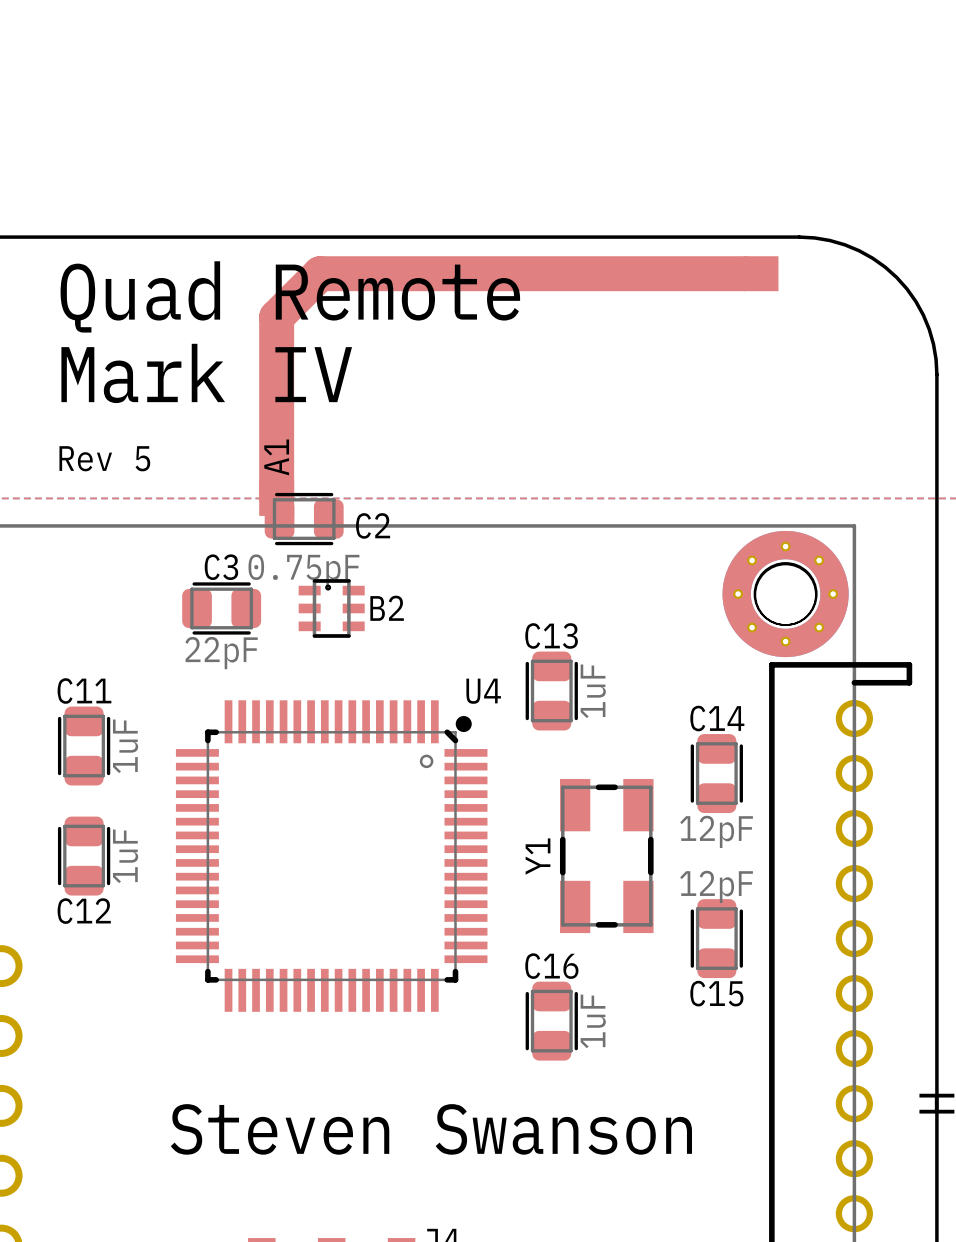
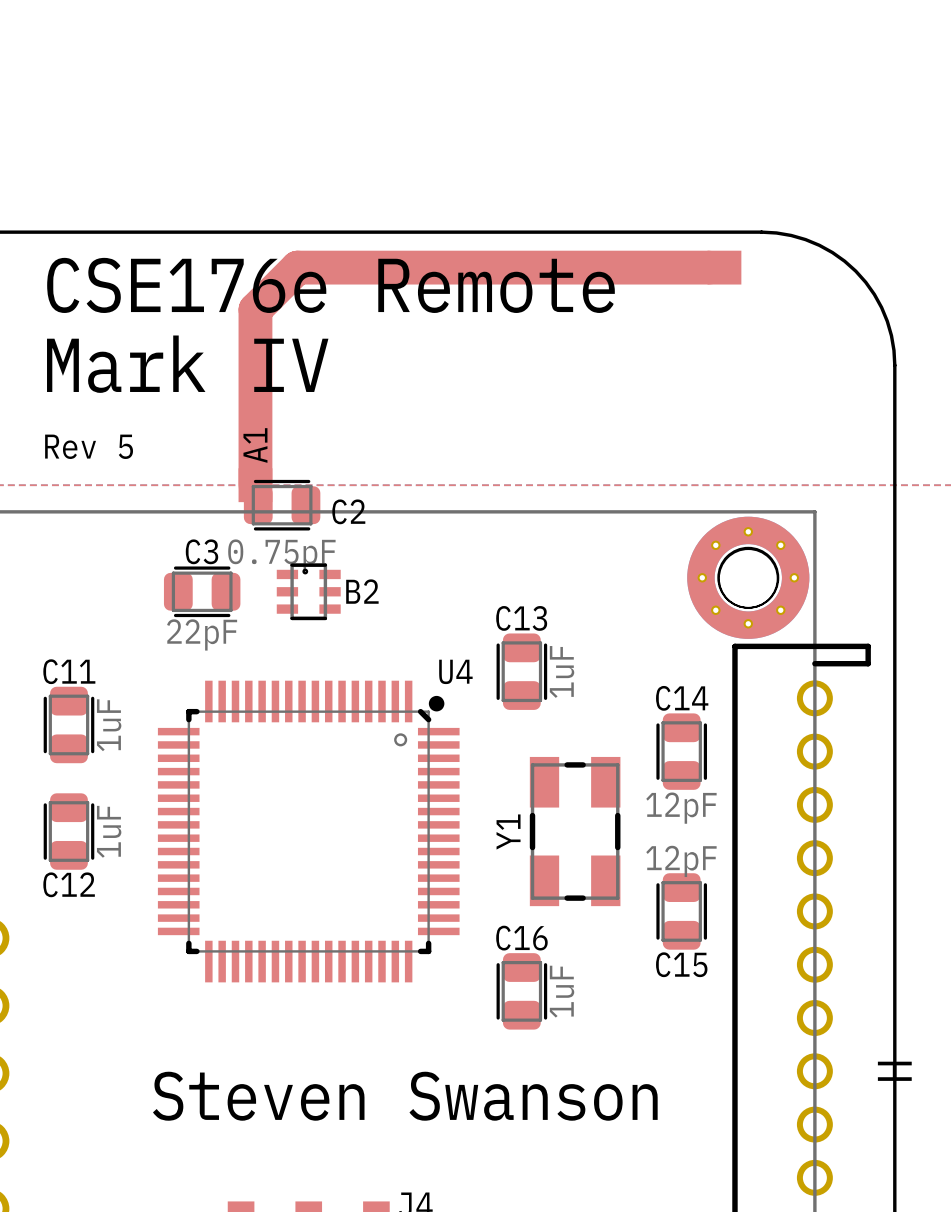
text: Quad Remote (290, 296) -> CSE176e Remote (330, 285)

